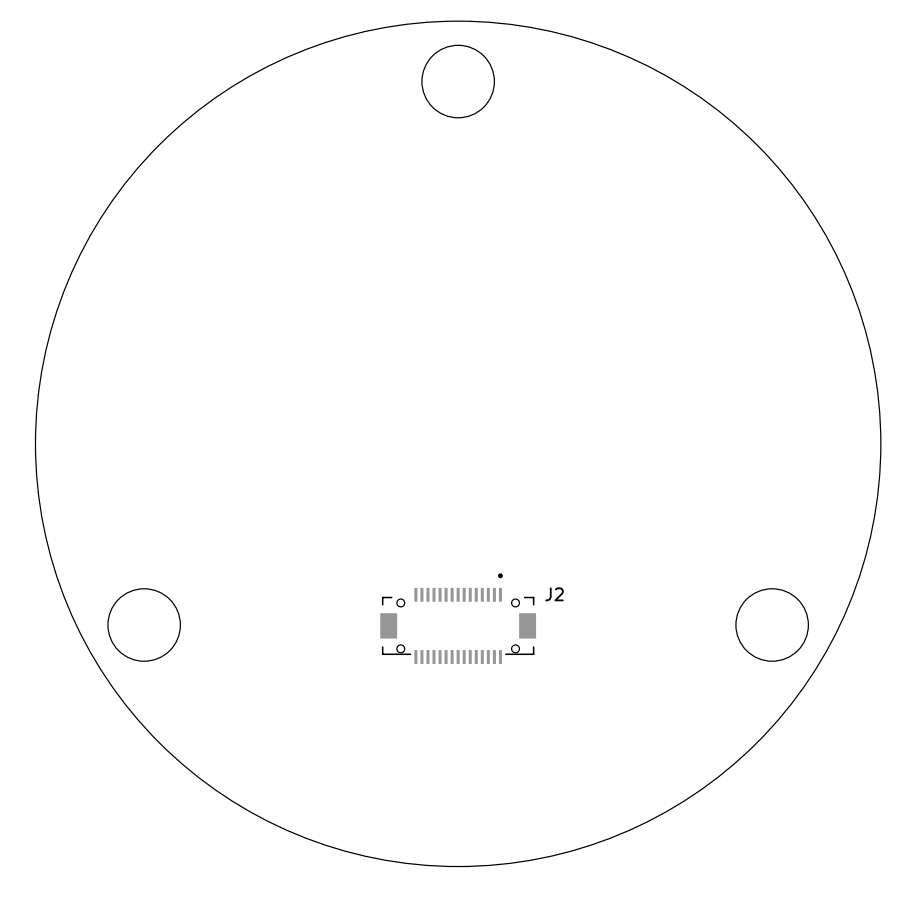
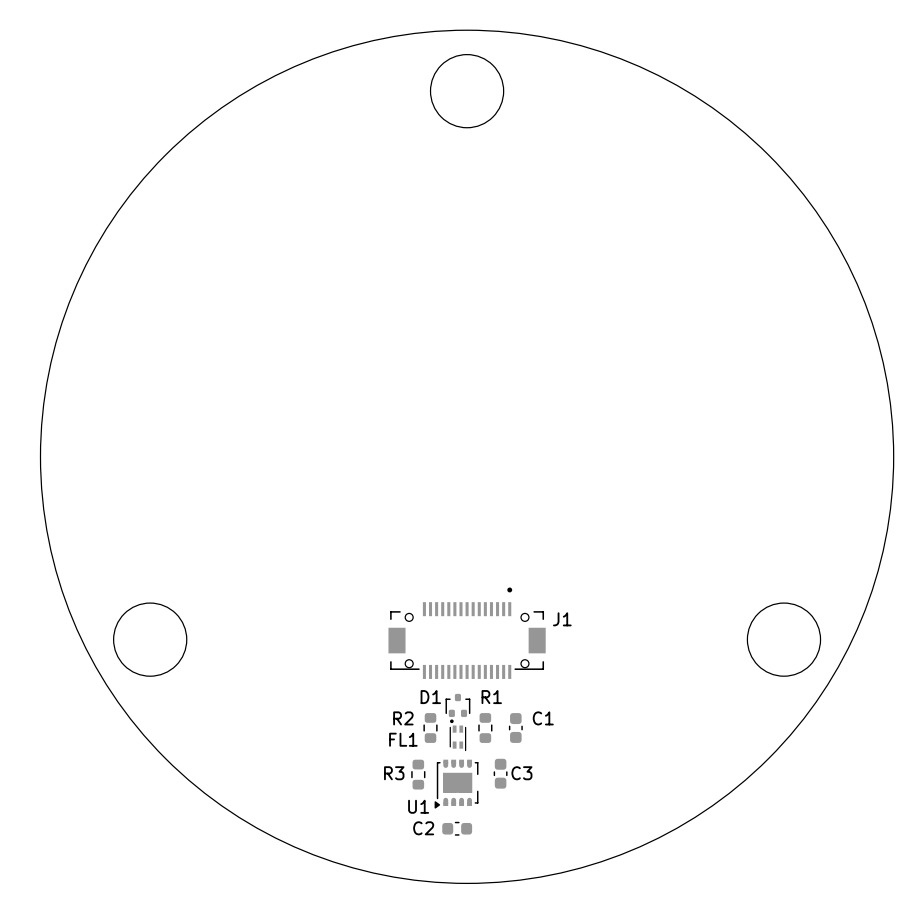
J2 name: J2 (554, 594) -> J1 (562, 619)
D1: none -> (457, 708)
R2: none -> (430, 728)
R1: none -> (485, 728)
C1: none -> (515, 728)
FL1: none -> (457, 738)
C3: none -> (500, 773)
R3: none -> (418, 774)
U1: none -> (456, 784)
C2: none -> (457, 828)

